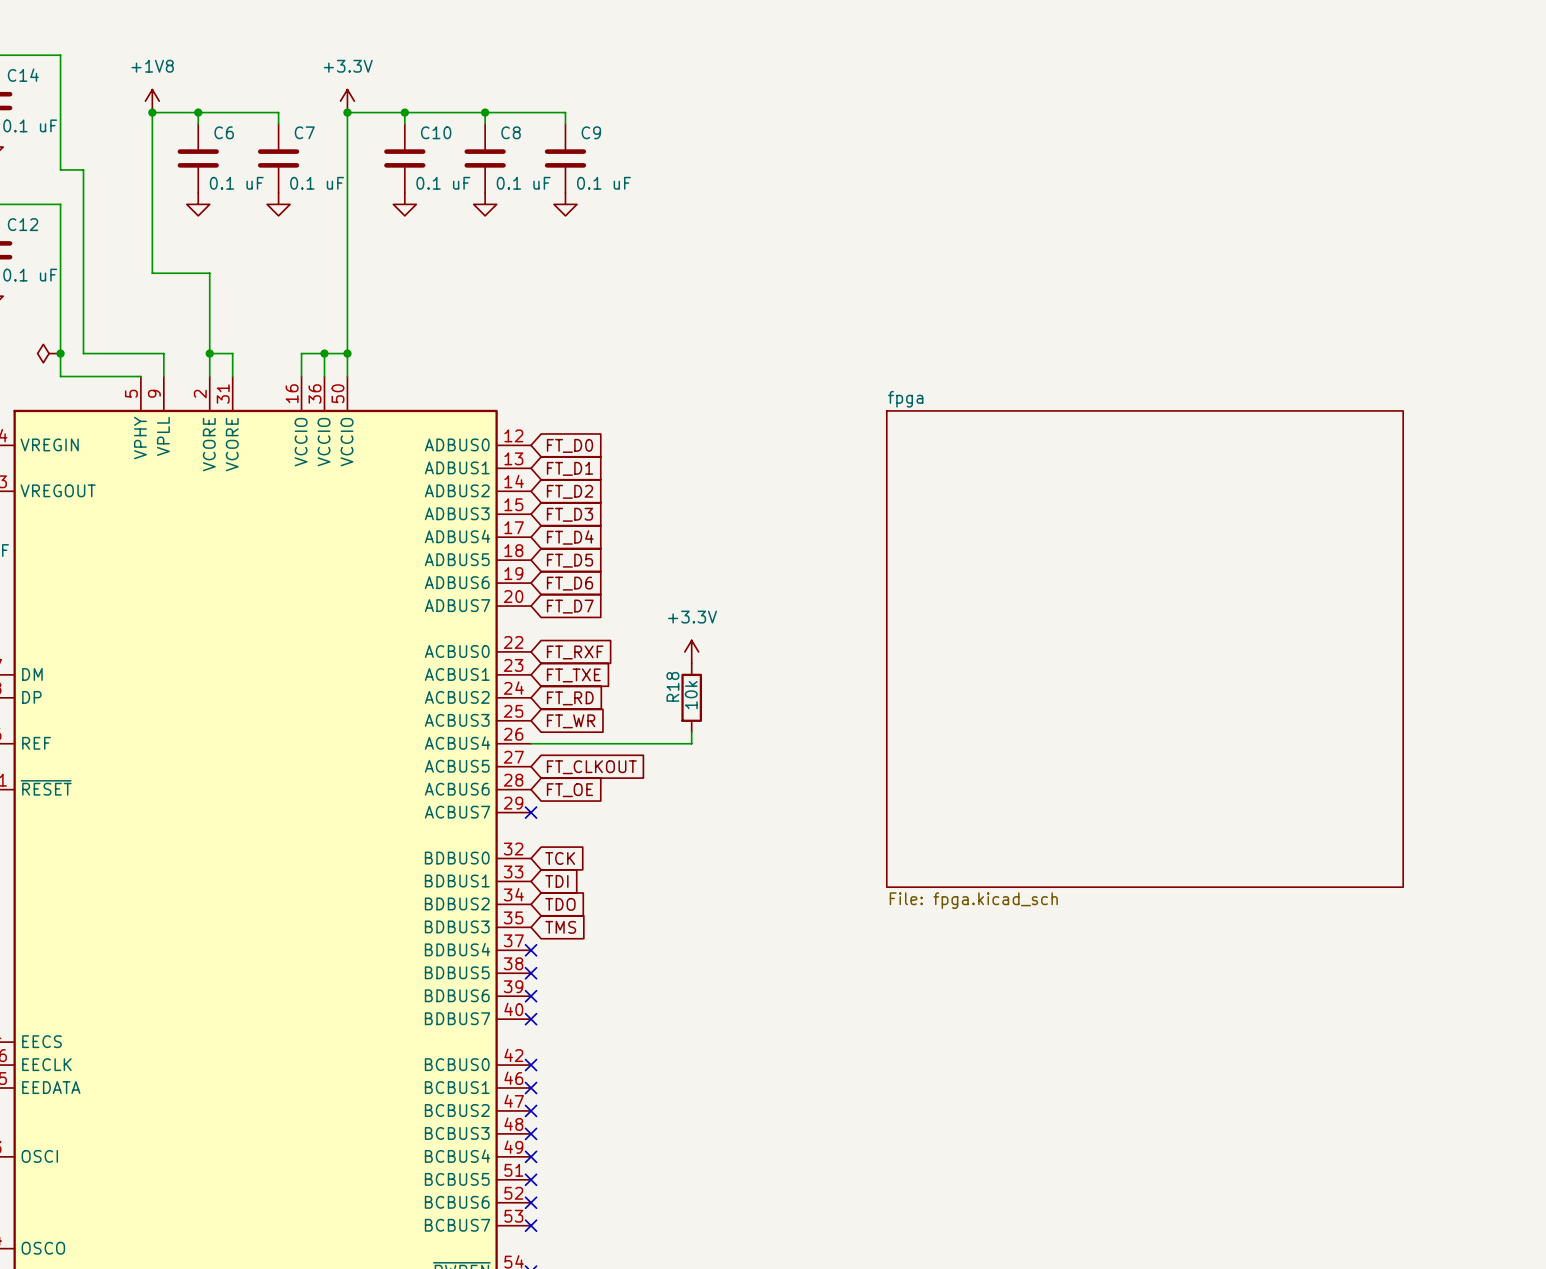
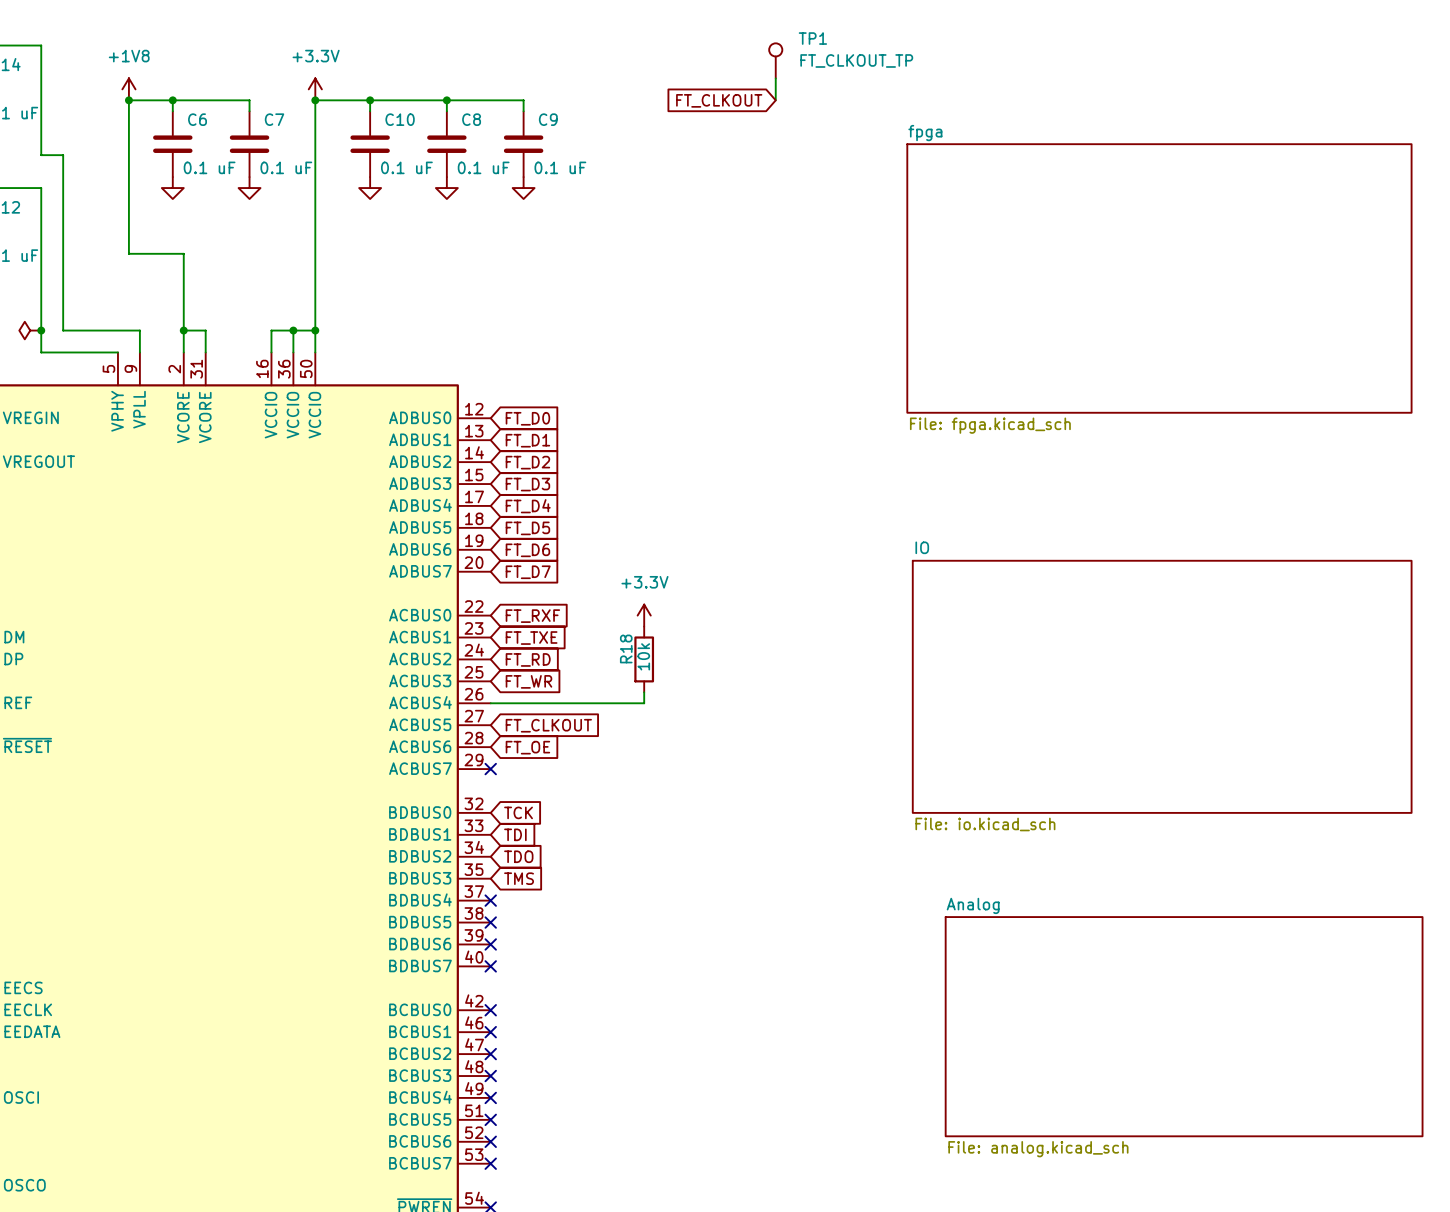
TP1: none -> FT_CLKOUT_TP (775, 60)
wire: none -> (775, 78) (775, 100)
global label: none -> FT_CLKOUT (719, 100)
sheet fpga: none -> File: fpga.kicad_sch (1159, 278)
sheet fpga: File: fpga.kicad_sch (1144, 649) -> none
sheet IO: none -> File: io.kicad_sch (1162, 686)
sheet Analog: none -> File: analog.kicad_sch (1184, 1026)

